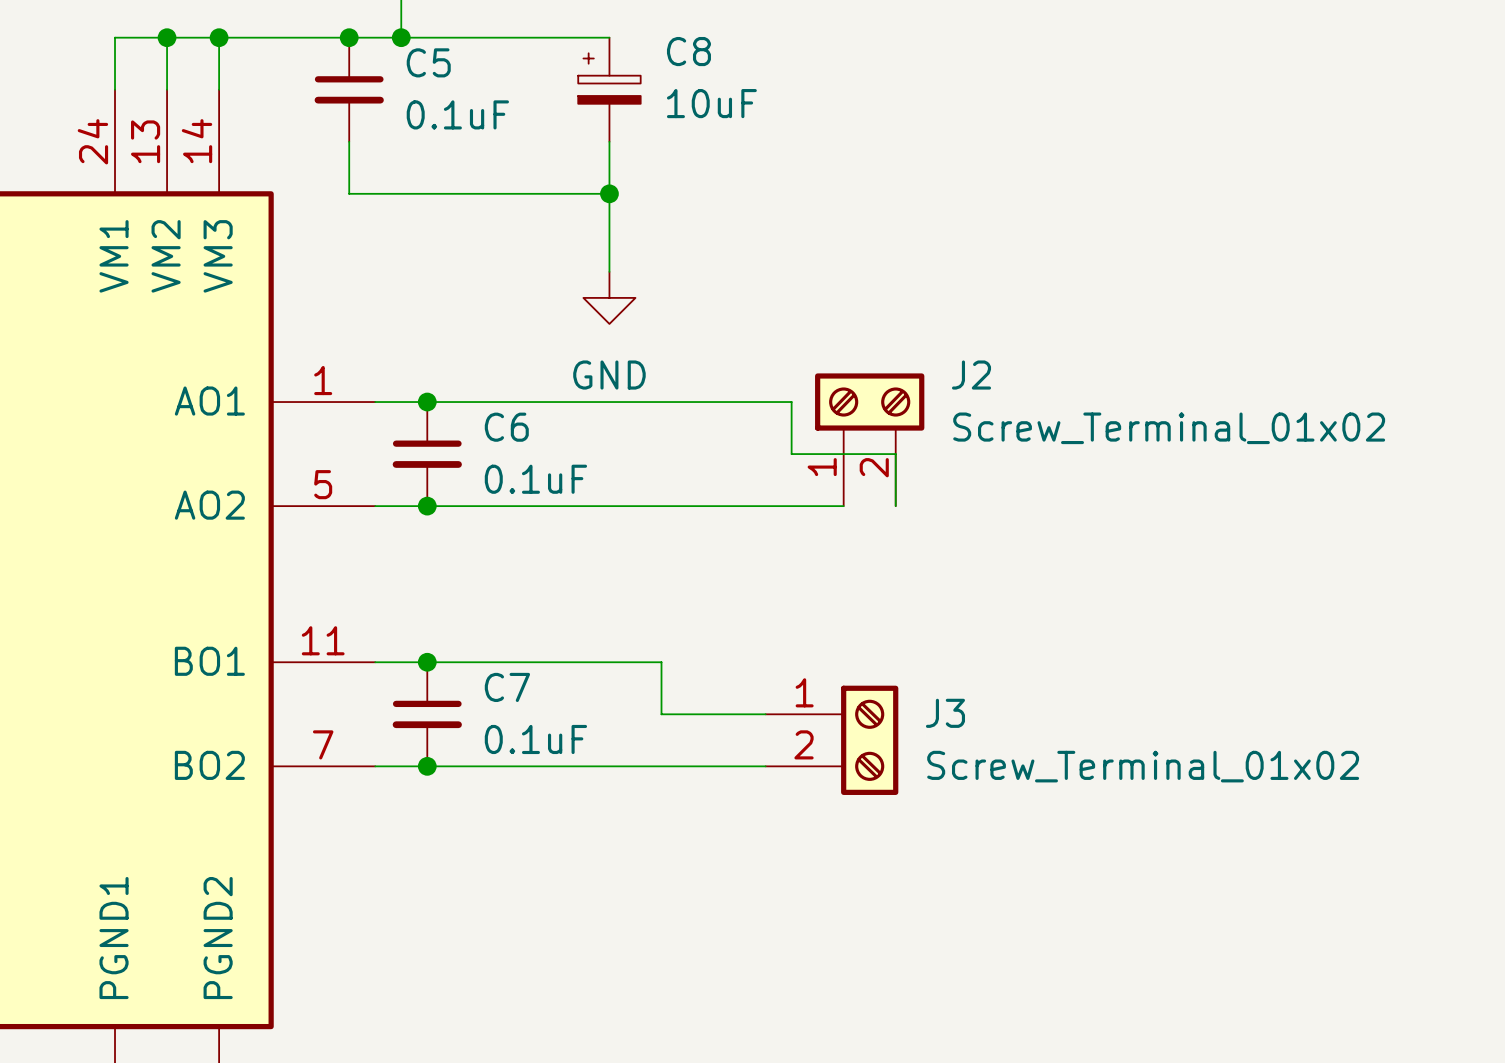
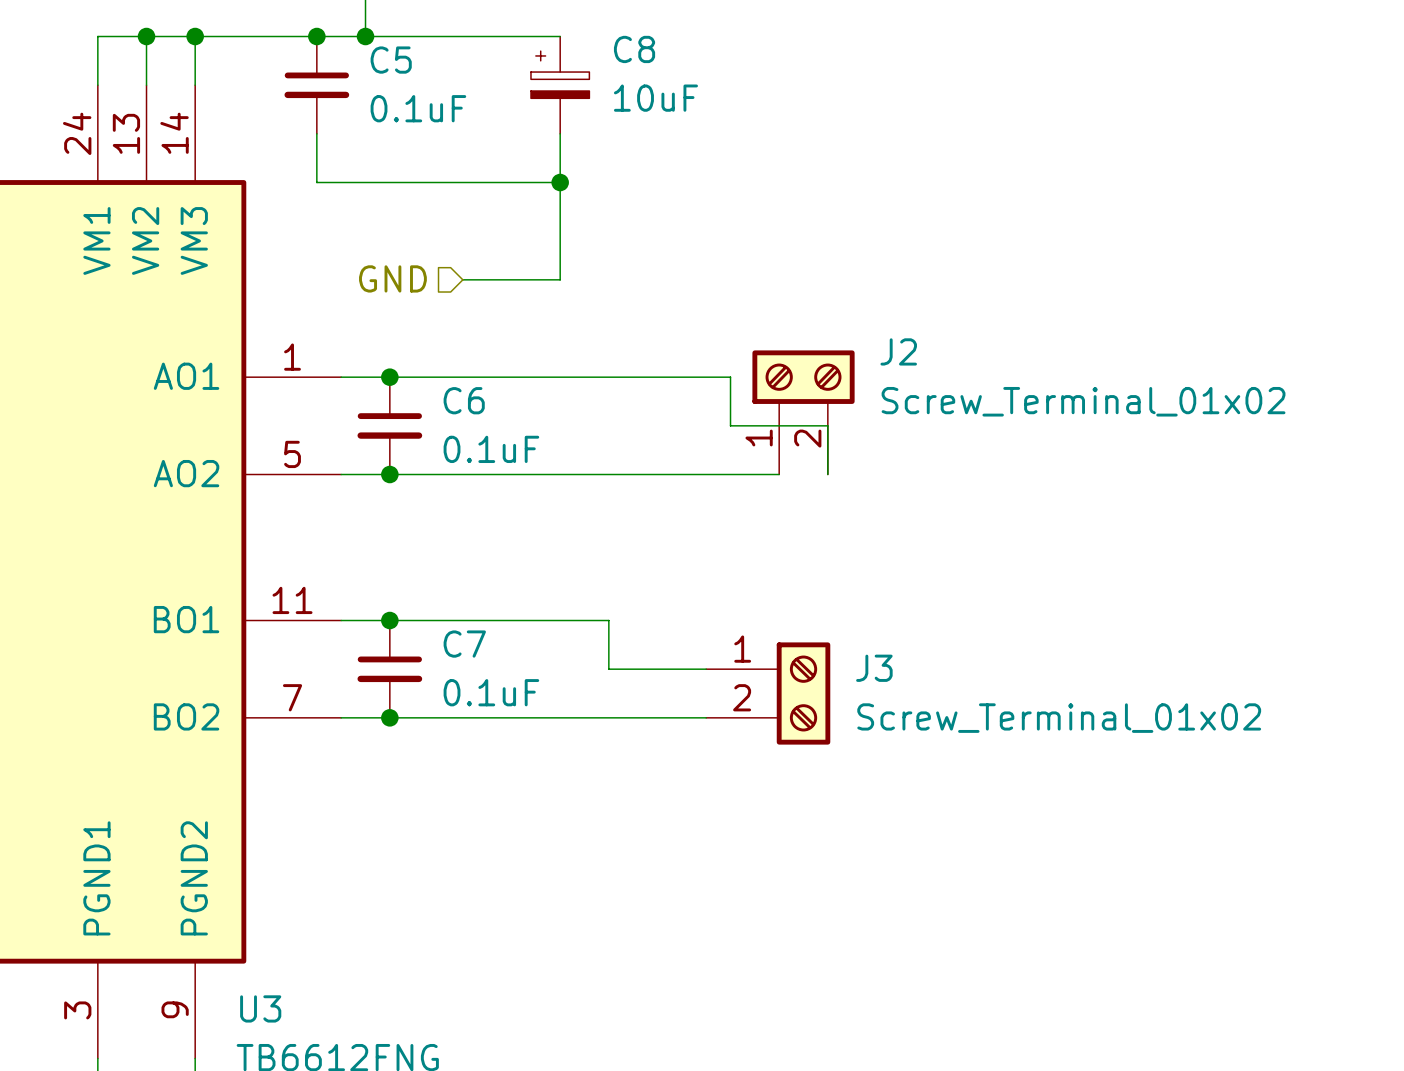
wire: none -> (560, 255) (560, 279) (462, 279)
hierarchical label: none -> GND (392, 278)
power symbol: GND (609, 297) -> none

